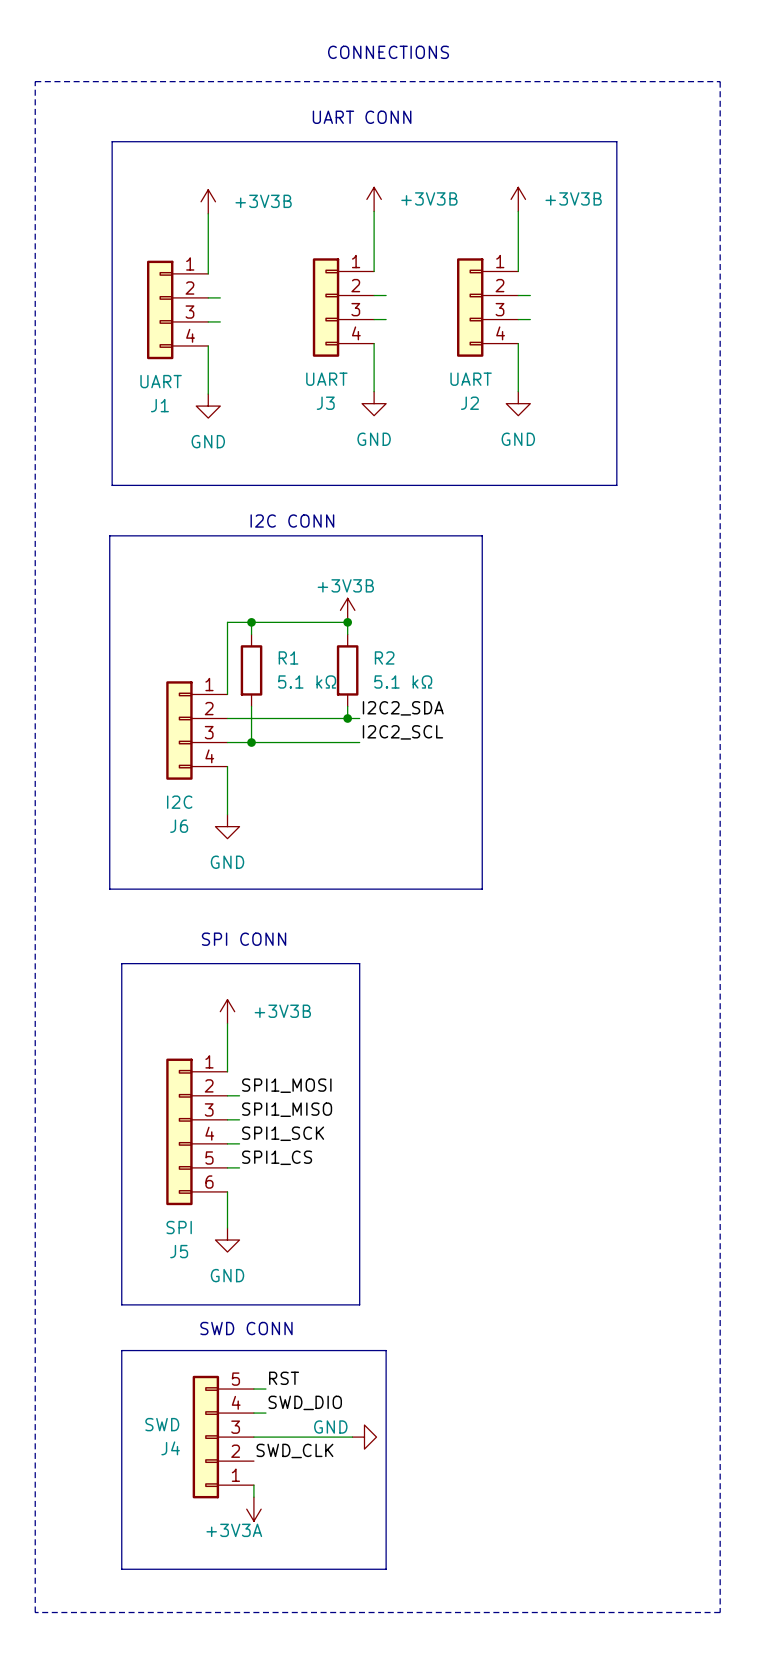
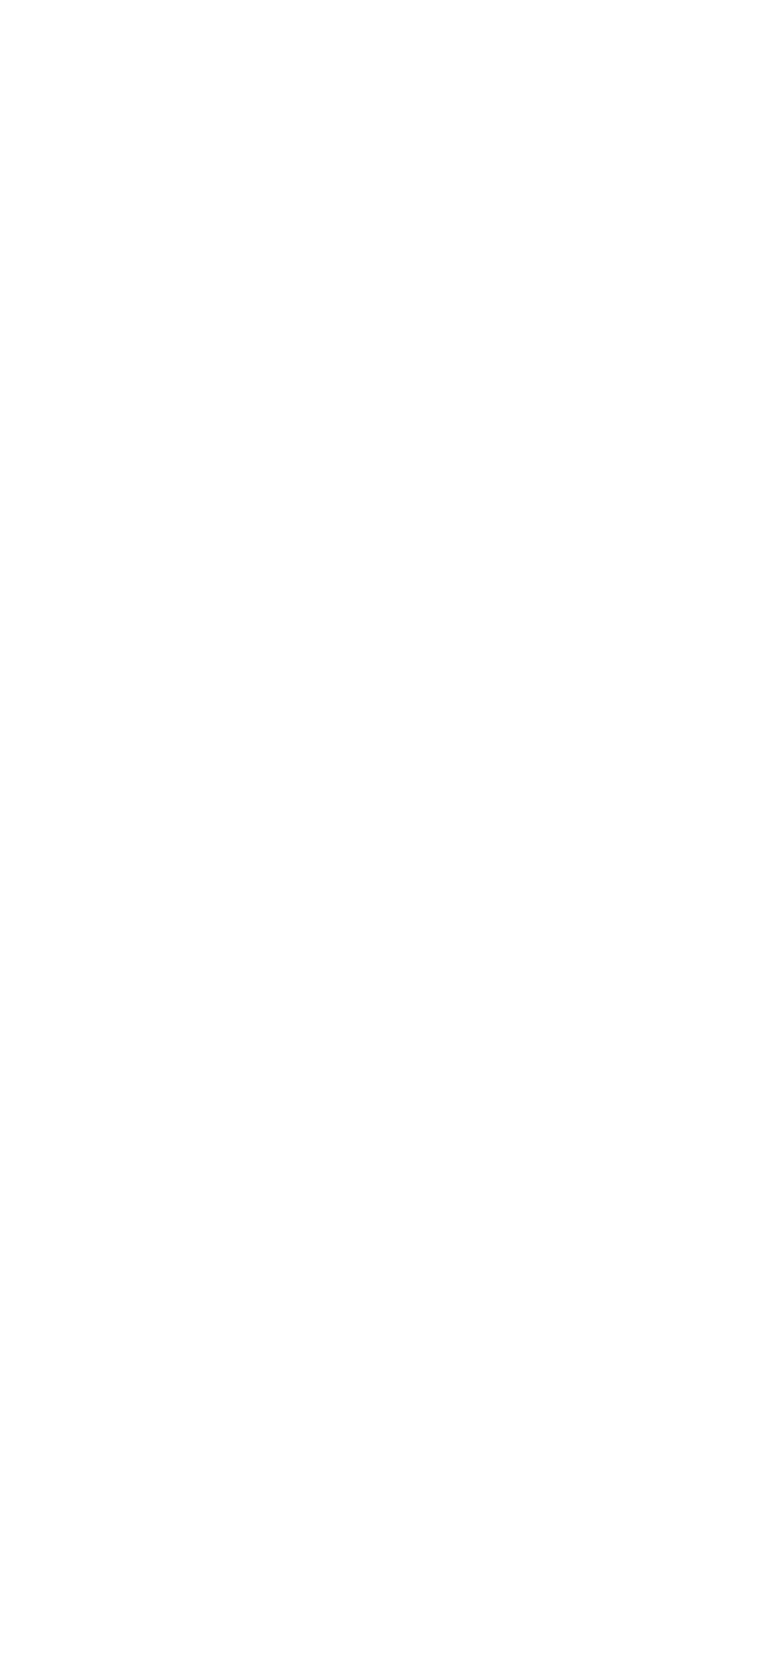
text: CONNECTIONS (388, 52) -> none
line: (35, 81) (720, 81) (720, 1612) (35, 1612) (35, 81) -> none
text: UART CONN (362, 117) -> none
line: (112, 141) (616, 141) (616, 485) (112, 485) (112, 141) -> none
power symbol: +3V3B (374, 199) -> none
power symbol: +3V3B (518, 199) -> none
power symbol: +3V3B (208, 201) -> none
wire: (374, 211) (374, 271) -> none
wire: (518, 211) (518, 271) -> none
wire: (208, 213) (208, 273) -> none
wire: (374, 295) (386, 295) -> none
wire: (518, 295) (530, 295) -> none
wire: (208, 297) (220, 297) -> none
J3: UART (343, 307) -> none
J2: UART (487, 307) -> none
J1: UART (177, 309) -> none
wire: (374, 319) (386, 319) -> none
wire: (518, 319) (530, 319) -> none
wire: (208, 321) (220, 321) -> none
wire: (374, 343) (374, 391) -> none
wire: (518, 343) (518, 391) -> none
wire: (208, 345) (208, 394) -> none
power symbol: GND (374, 403) -> none
power symbol: GND (518, 403) -> none
power symbol: GND (208, 406) -> none
text: I2C CONN (292, 521) -> none
line: (109, 535) (482, 535) (482, 889) (109, 889) (109, 535) -> none
power symbol: +3V3B (347, 610) -> none
wire: (251, 622) (251, 634) -> none
junction: (251, 622) -> none
junction: (347, 622) -> none
wire: (347, 634) (347, 622) (227, 622) (227, 694) -> none
R1: 5.1 kΩ (251, 670) -> none
R2: 5.1 kΩ (347, 670) -> none
wire: (251, 706) (251, 742) -> none
wire: (347, 706) (347, 718) -> none
label: I2C2_SDA (403, 708) -> none
wire: (227, 718) (359, 718) -> none
junction: (347, 718) -> none
J6: I2C (196, 730) -> none
label: I2C2_SCL (402, 732) -> none
wire: (227, 742) (359, 742) -> none
junction: (251, 742) -> none
wire: (227, 766) (227, 814) -> none
power symbol: GND (227, 826) -> none
text: SPI CONN (244, 939) -> none
line: (121, 963) (359, 963) (359, 1304) (121, 1304) (121, 963) -> none
power symbol: +3V3B (227, 1011) -> none
wire: (227, 1023) (227, 1071) -> none
label: SPI1_MOSI (286, 1085) -> none
wire: (227, 1095) (239, 1095) -> none
label: SPI1_MISO (287, 1109) -> none
wire: (227, 1119) (239, 1119) -> none
J5: SPI (196, 1131) -> none
label: SPI1_SCK (283, 1133) -> none
wire: (227, 1143) (239, 1143) -> none
label: SPI1_CS (277, 1157) -> none
wire: (227, 1167) (239, 1167) -> none
wire: (227, 1191) (227, 1227) -> none
power symbol: GND (227, 1240) -> none
text: SWD CONN (246, 1328) -> none
line: (121, 1350) (121, 1569) (386, 1569) (386, 1350) (121, 1350) -> none
label: RST (284, 1378) -> none
wire: (253, 1389) (265, 1389) -> none
label: SWD_DIO (305, 1402) -> none
wire: (253, 1413) (265, 1413) -> none
J4: SWD (223, 1437) -> none
wire: (253, 1437) (352, 1437) -> none
power symbol: GND (364, 1437) -> none
label: SWD_CLK (294, 1450) -> none
wire: (253, 1485) (253, 1497) -> none
power symbol: +3V3A (253, 1509) -> none

